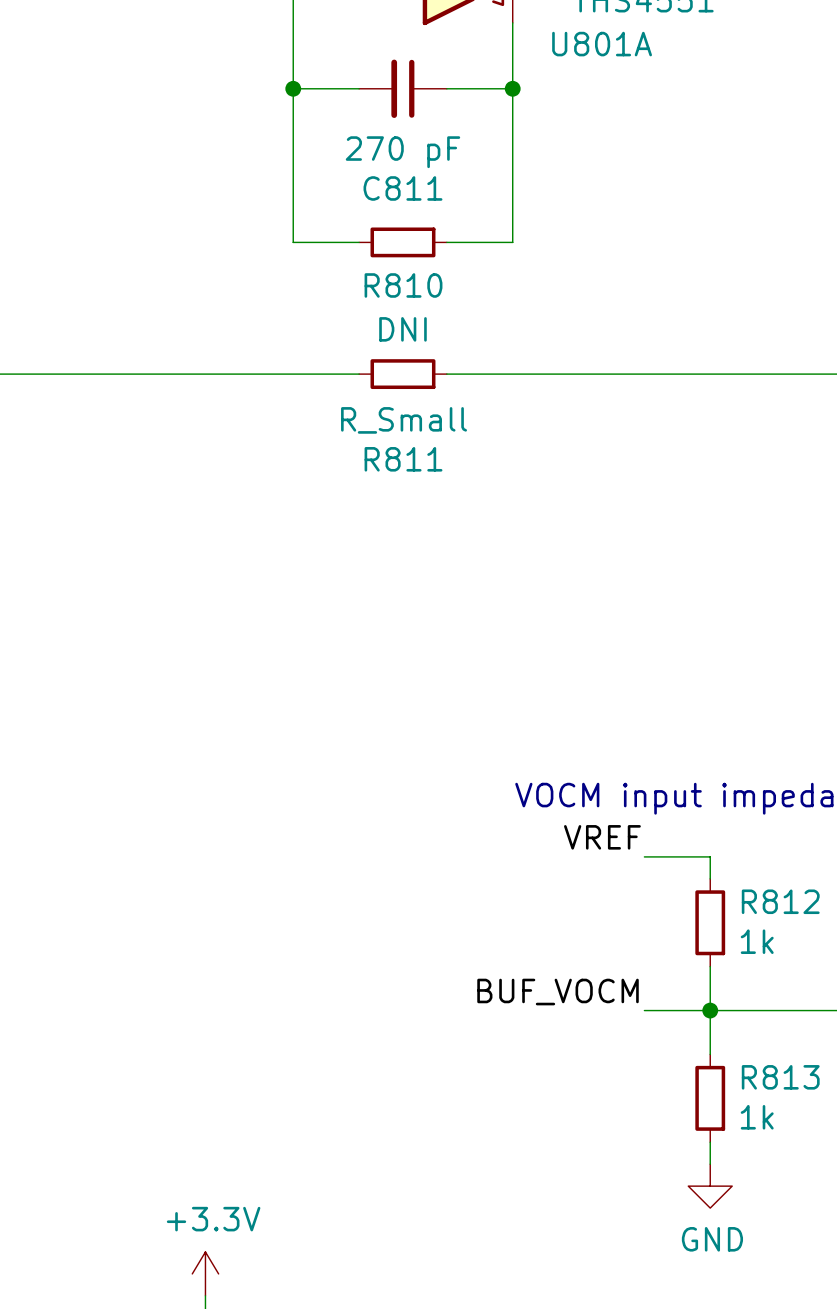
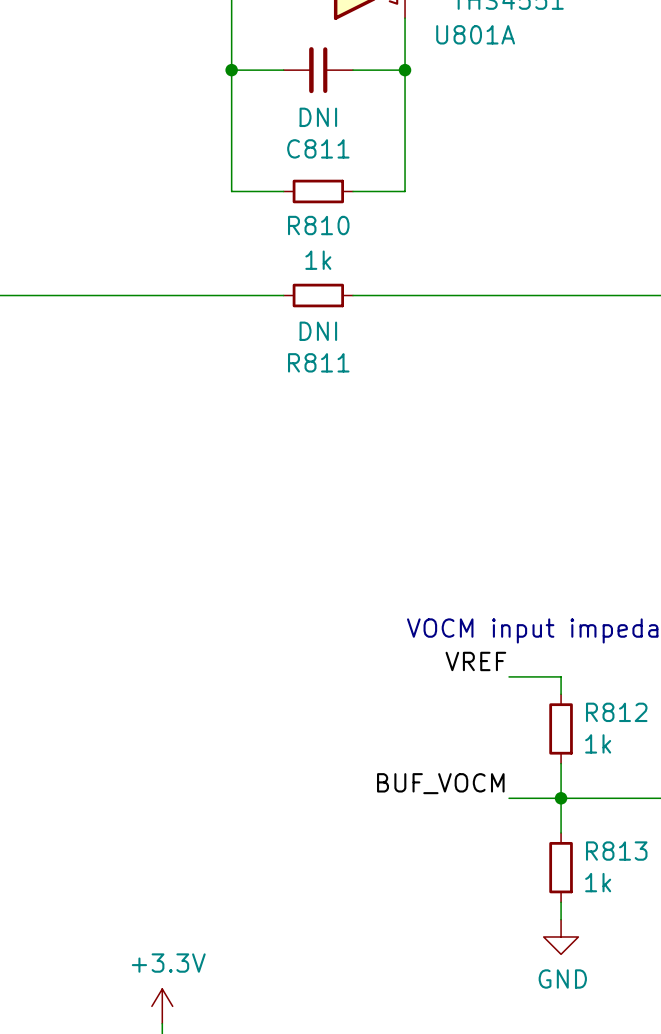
C811 value: 270 pF (402, 152) -> DNI (318, 117)
R810 value: DNI (402, 329) -> 1k (318, 260)
R811 value: R_Small (404, 420) -> DNI (318, 331)

